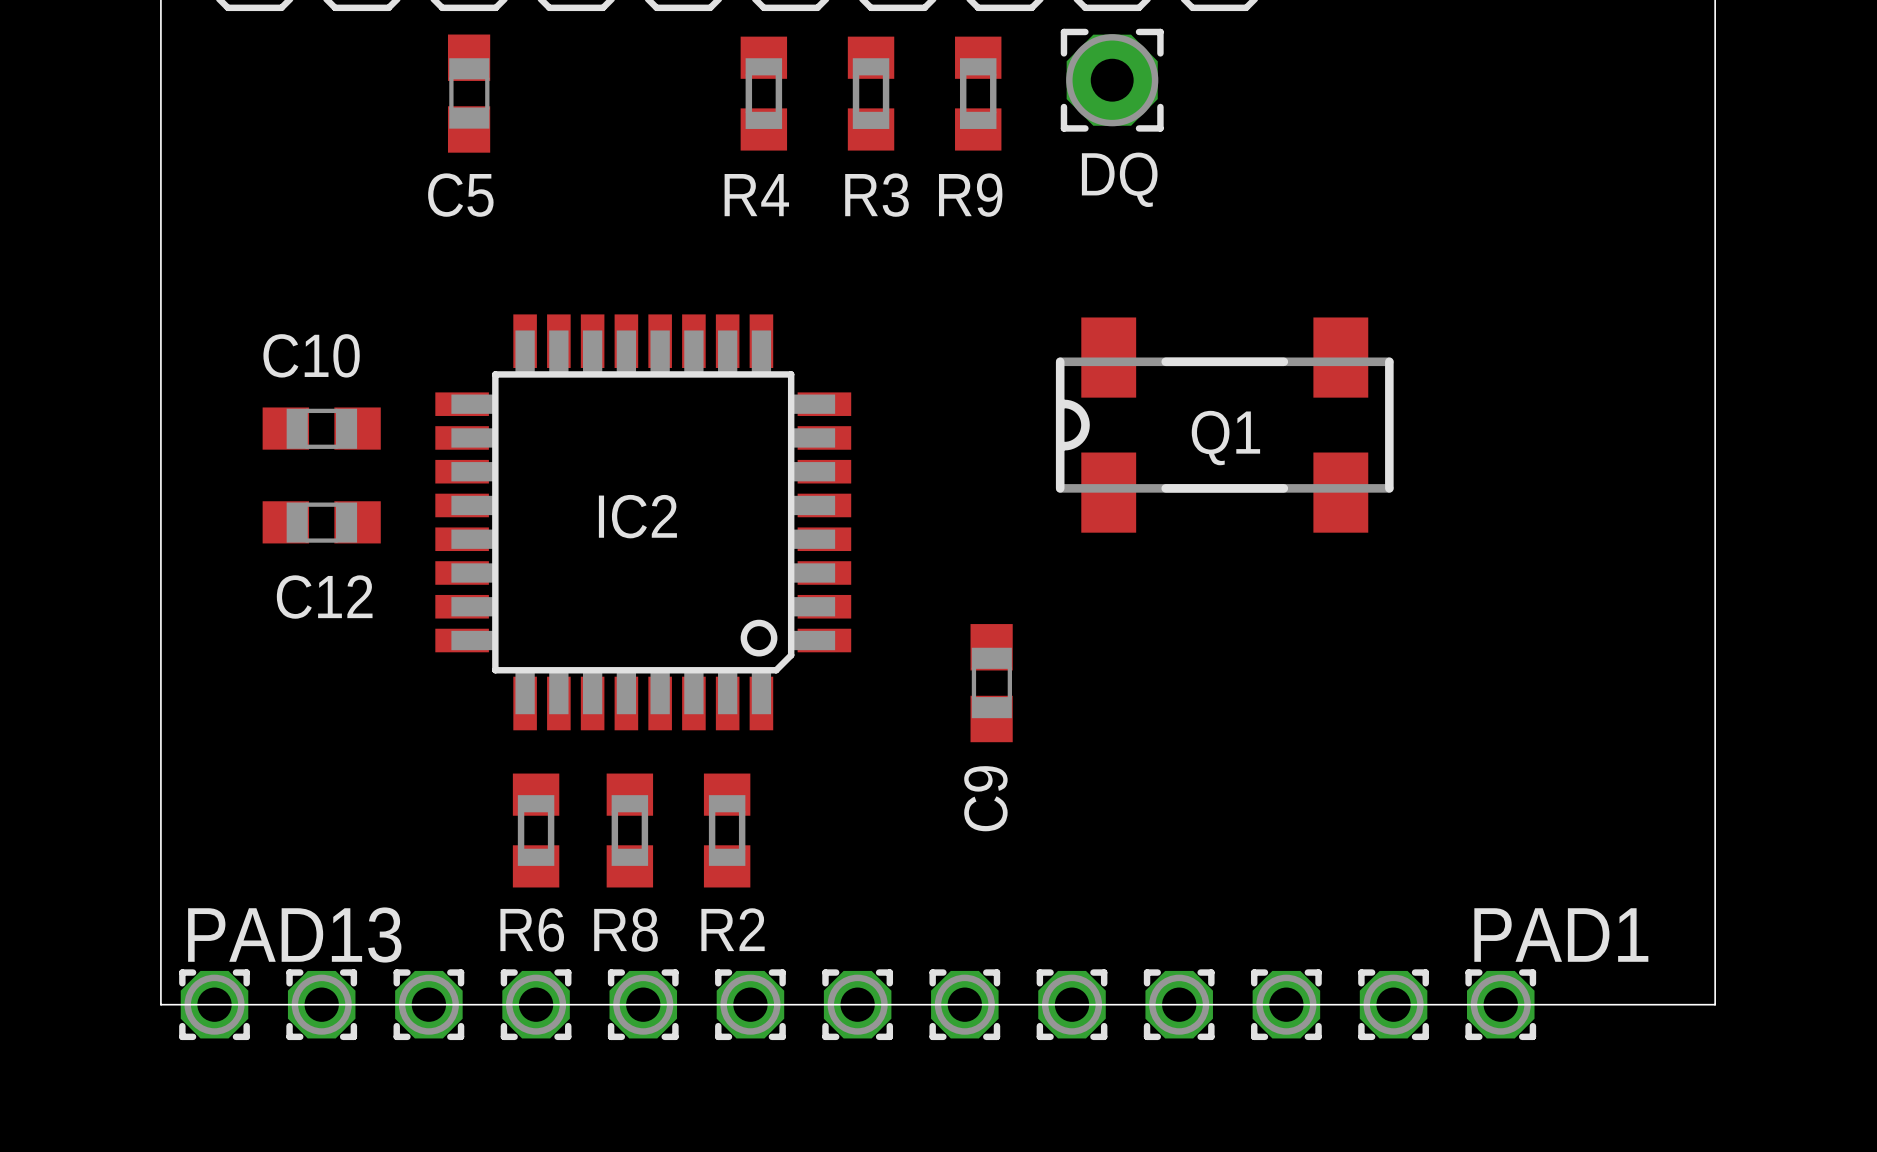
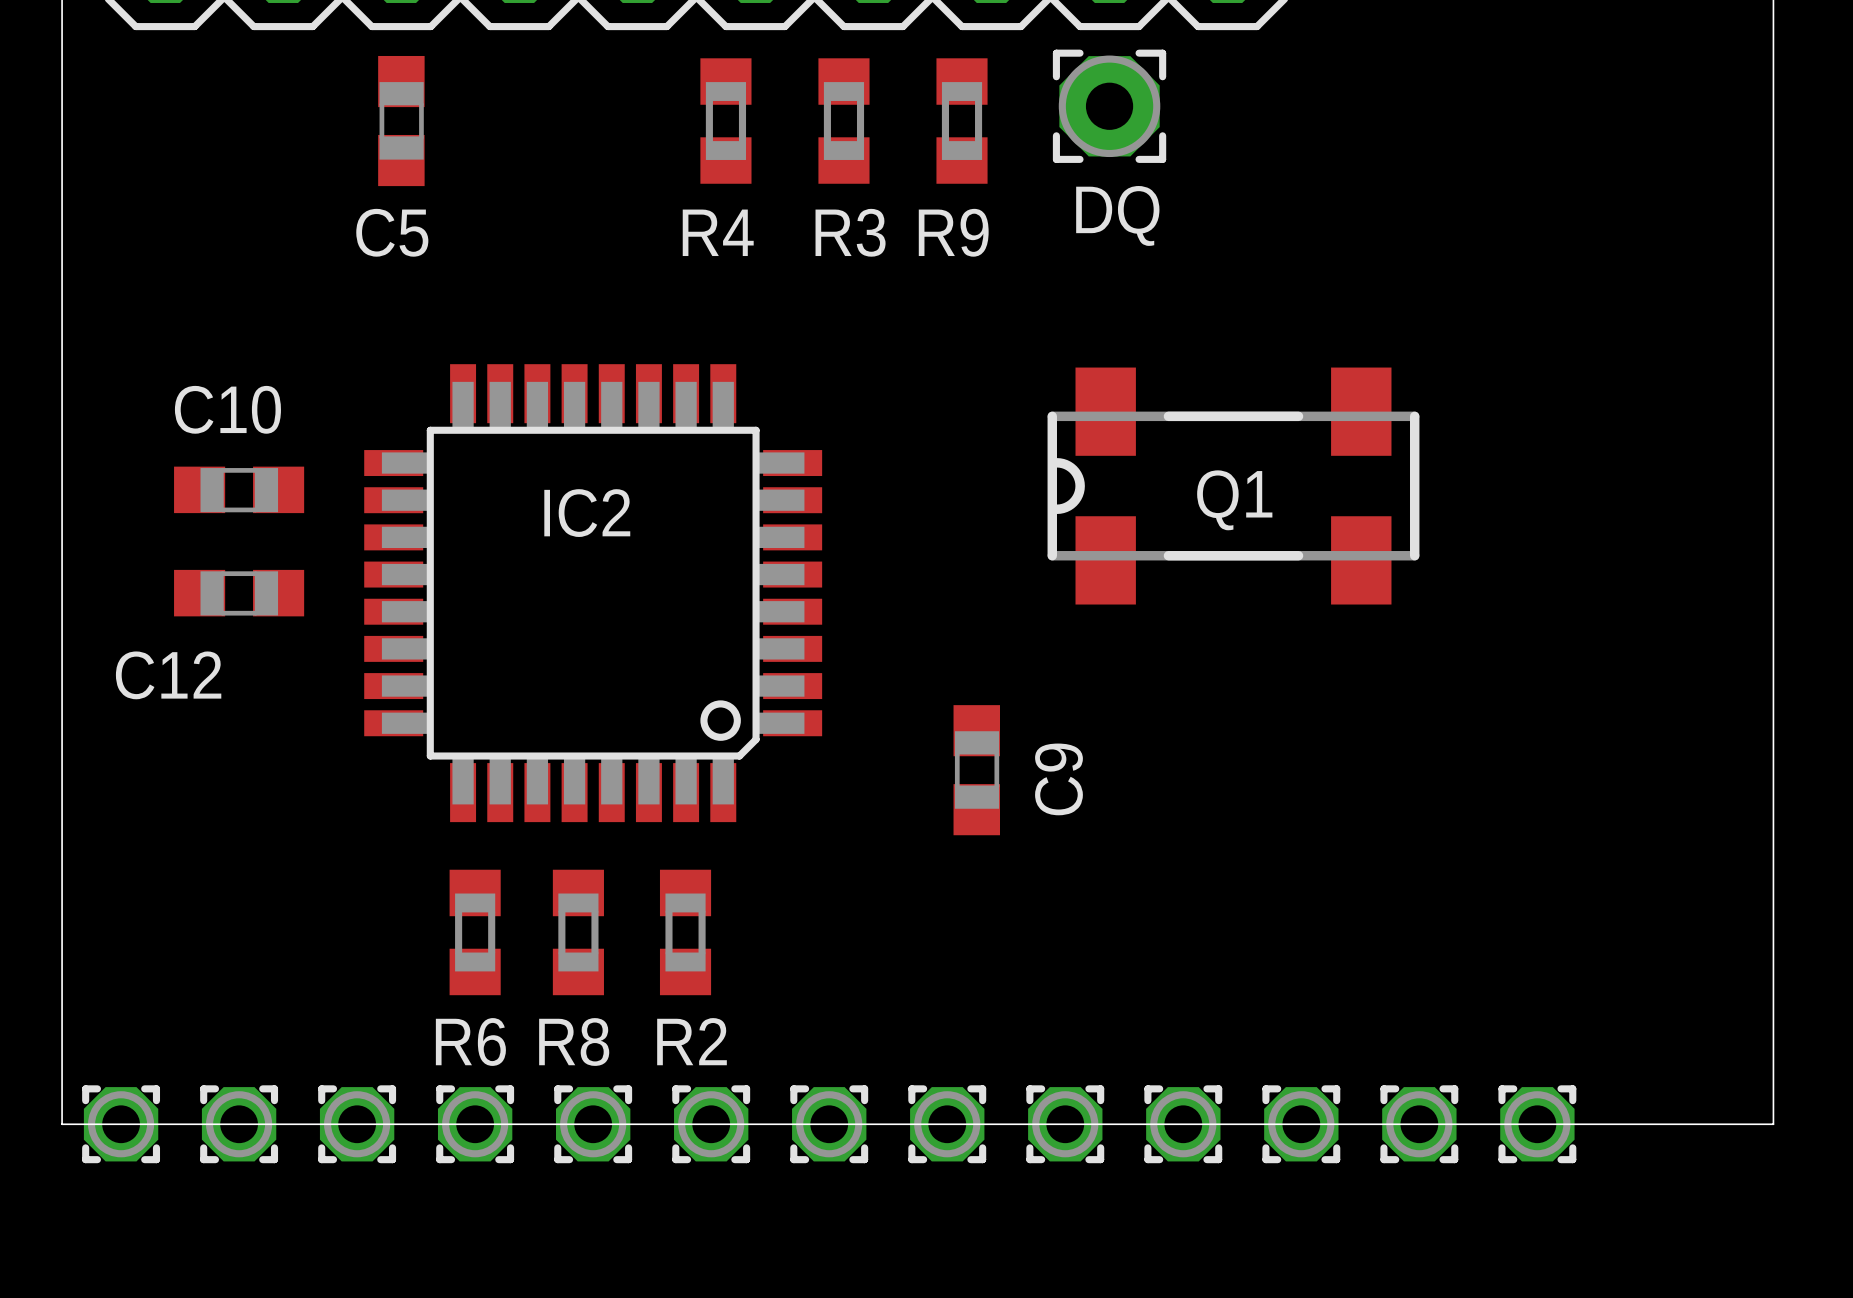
IC2 name position: IC2 (637, 516) -> IC2 (587, 513)
C12 name position: C12 (324, 597) -> C12 (168, 675)
C9 name position: C9 (985, 798) -> C9 (1058, 779)
PAD13 name: PAD13 (294, 935) -> none
PAD1 name: PAD1 (1561, 935) -> none

